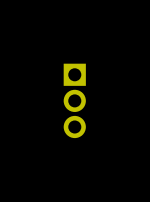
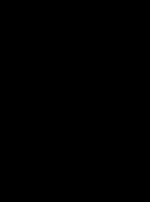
part: (74, 100) -> none

